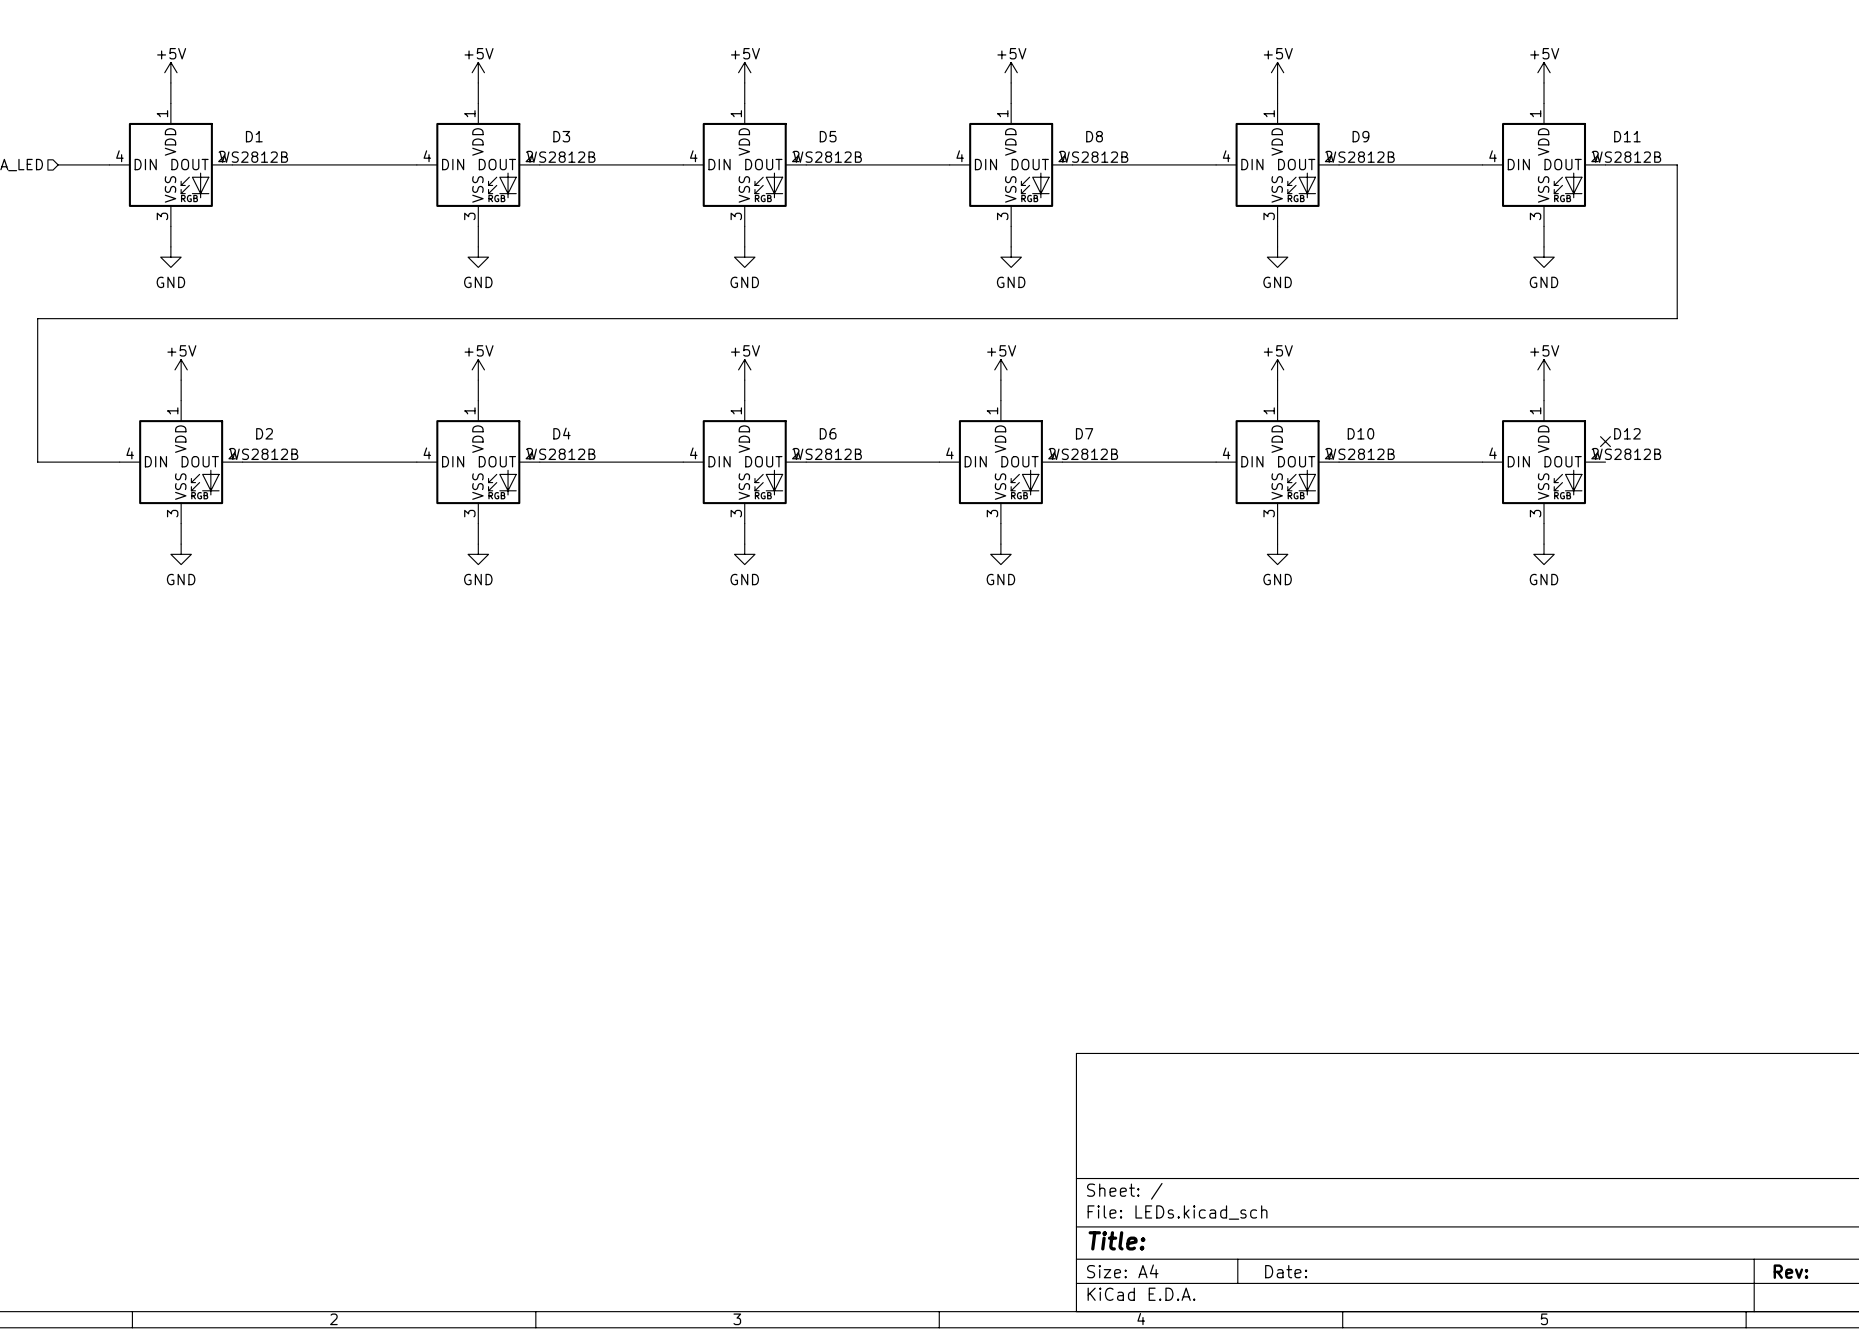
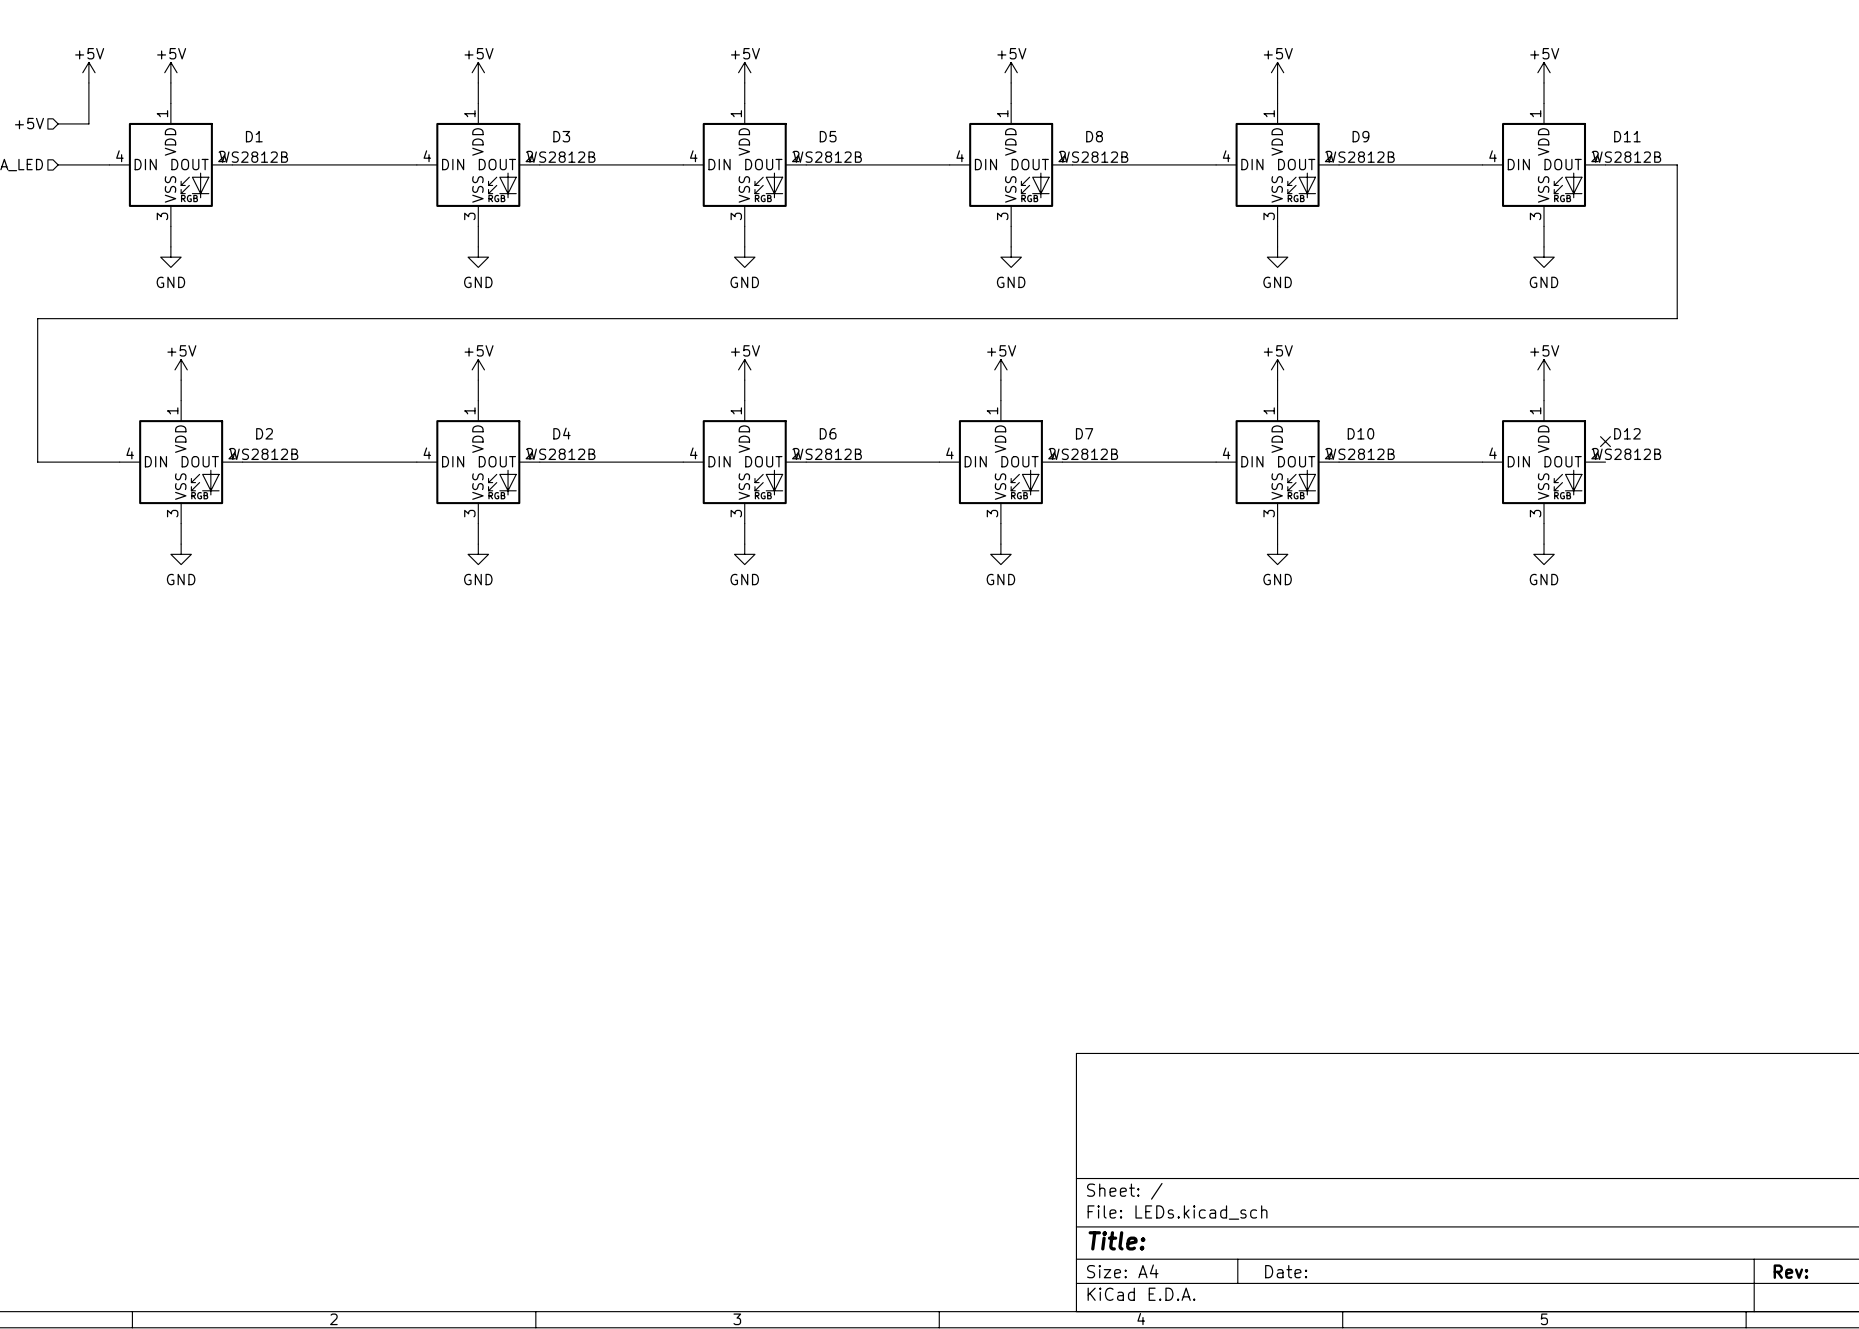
power symbol: none -> +5V (88, 72)
wire: none -> (88, 82) (88, 123) (58, 123)
hierarchical label: none -> +5V (29, 123)

